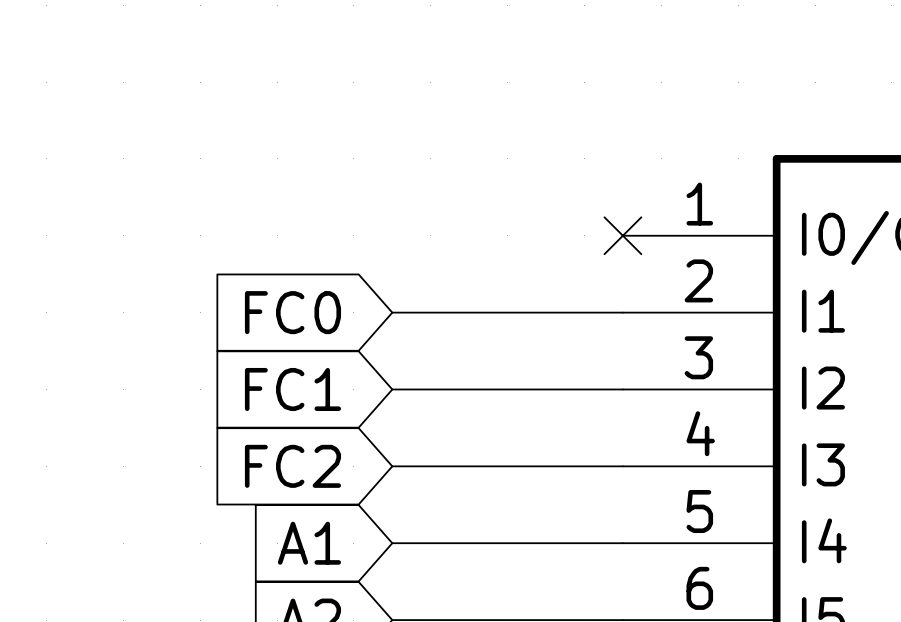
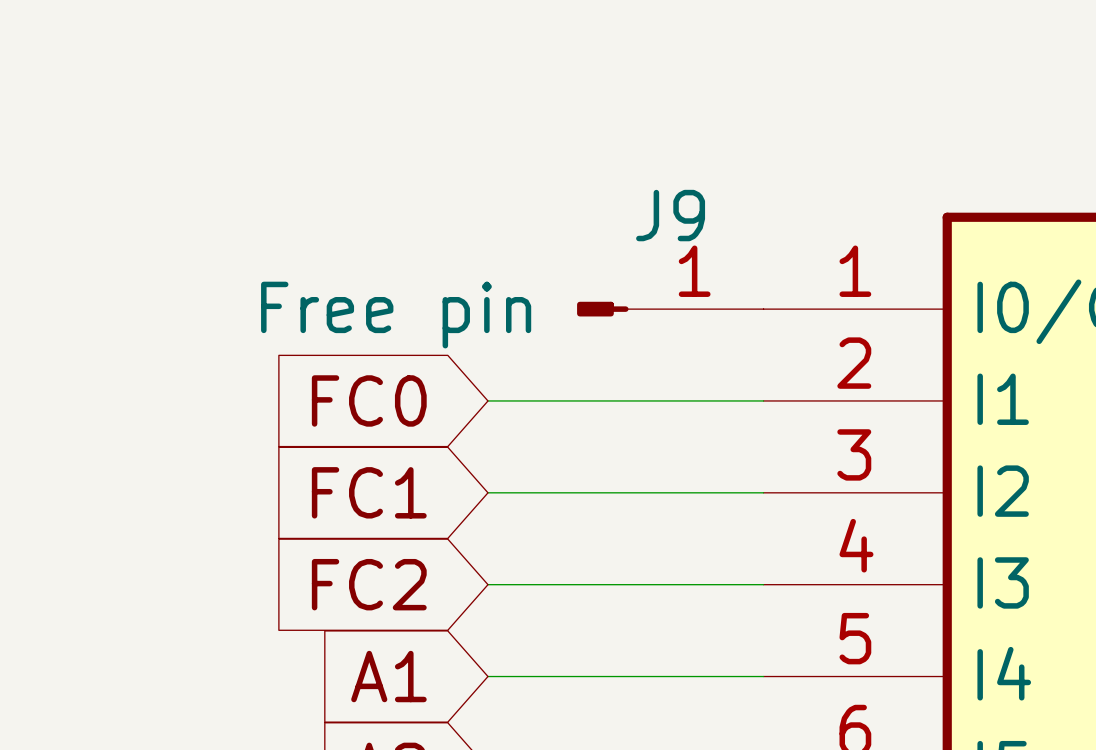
J9: none -> Free pin (670, 309)
no-connect mark: (622, 235) -> none

